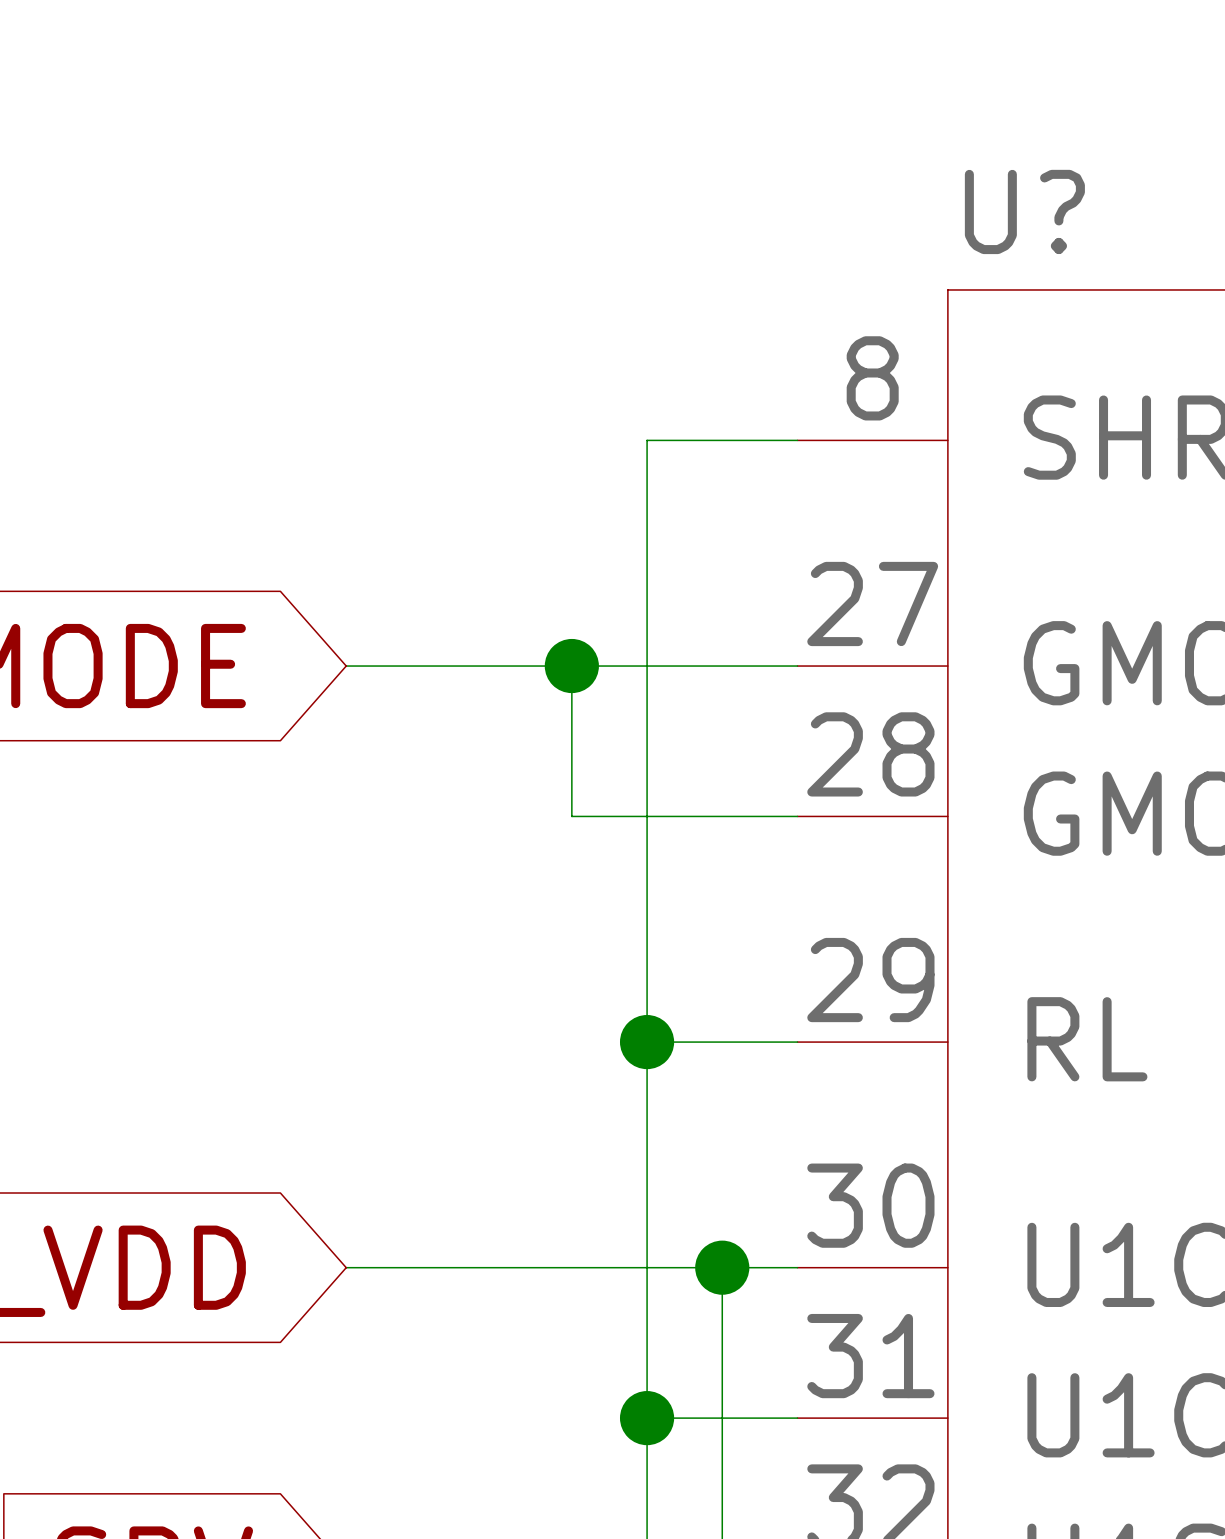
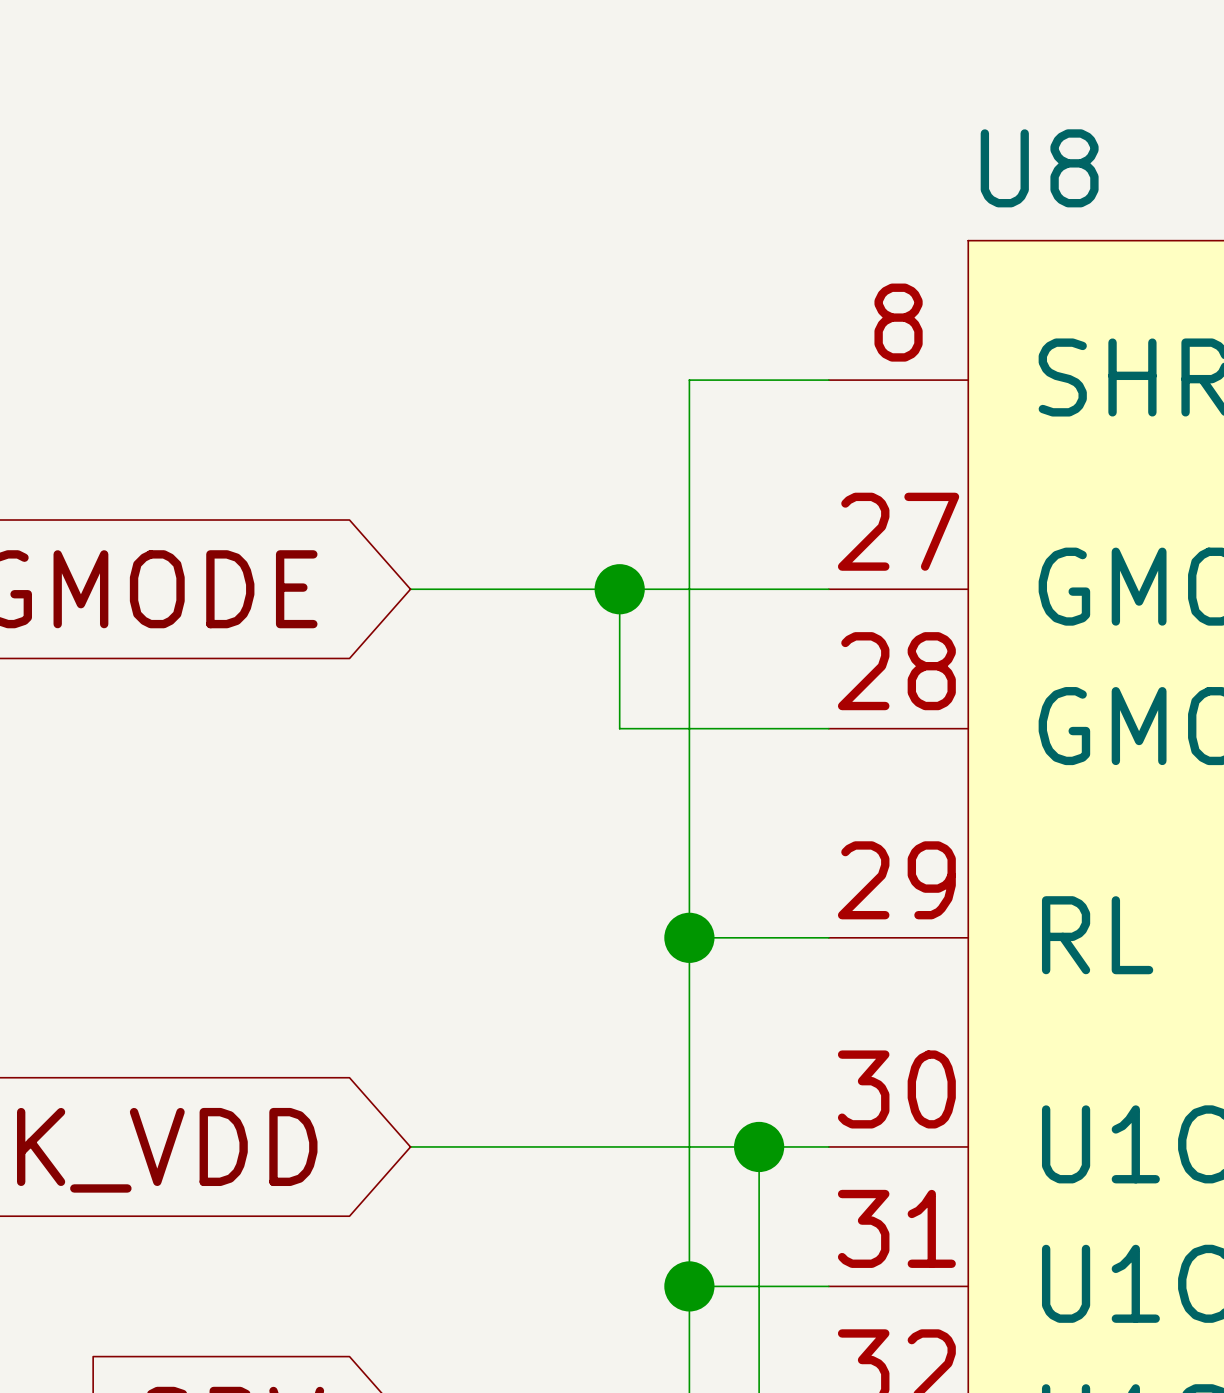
U? name: U? (1024, 211) -> U8 (1039, 168)

